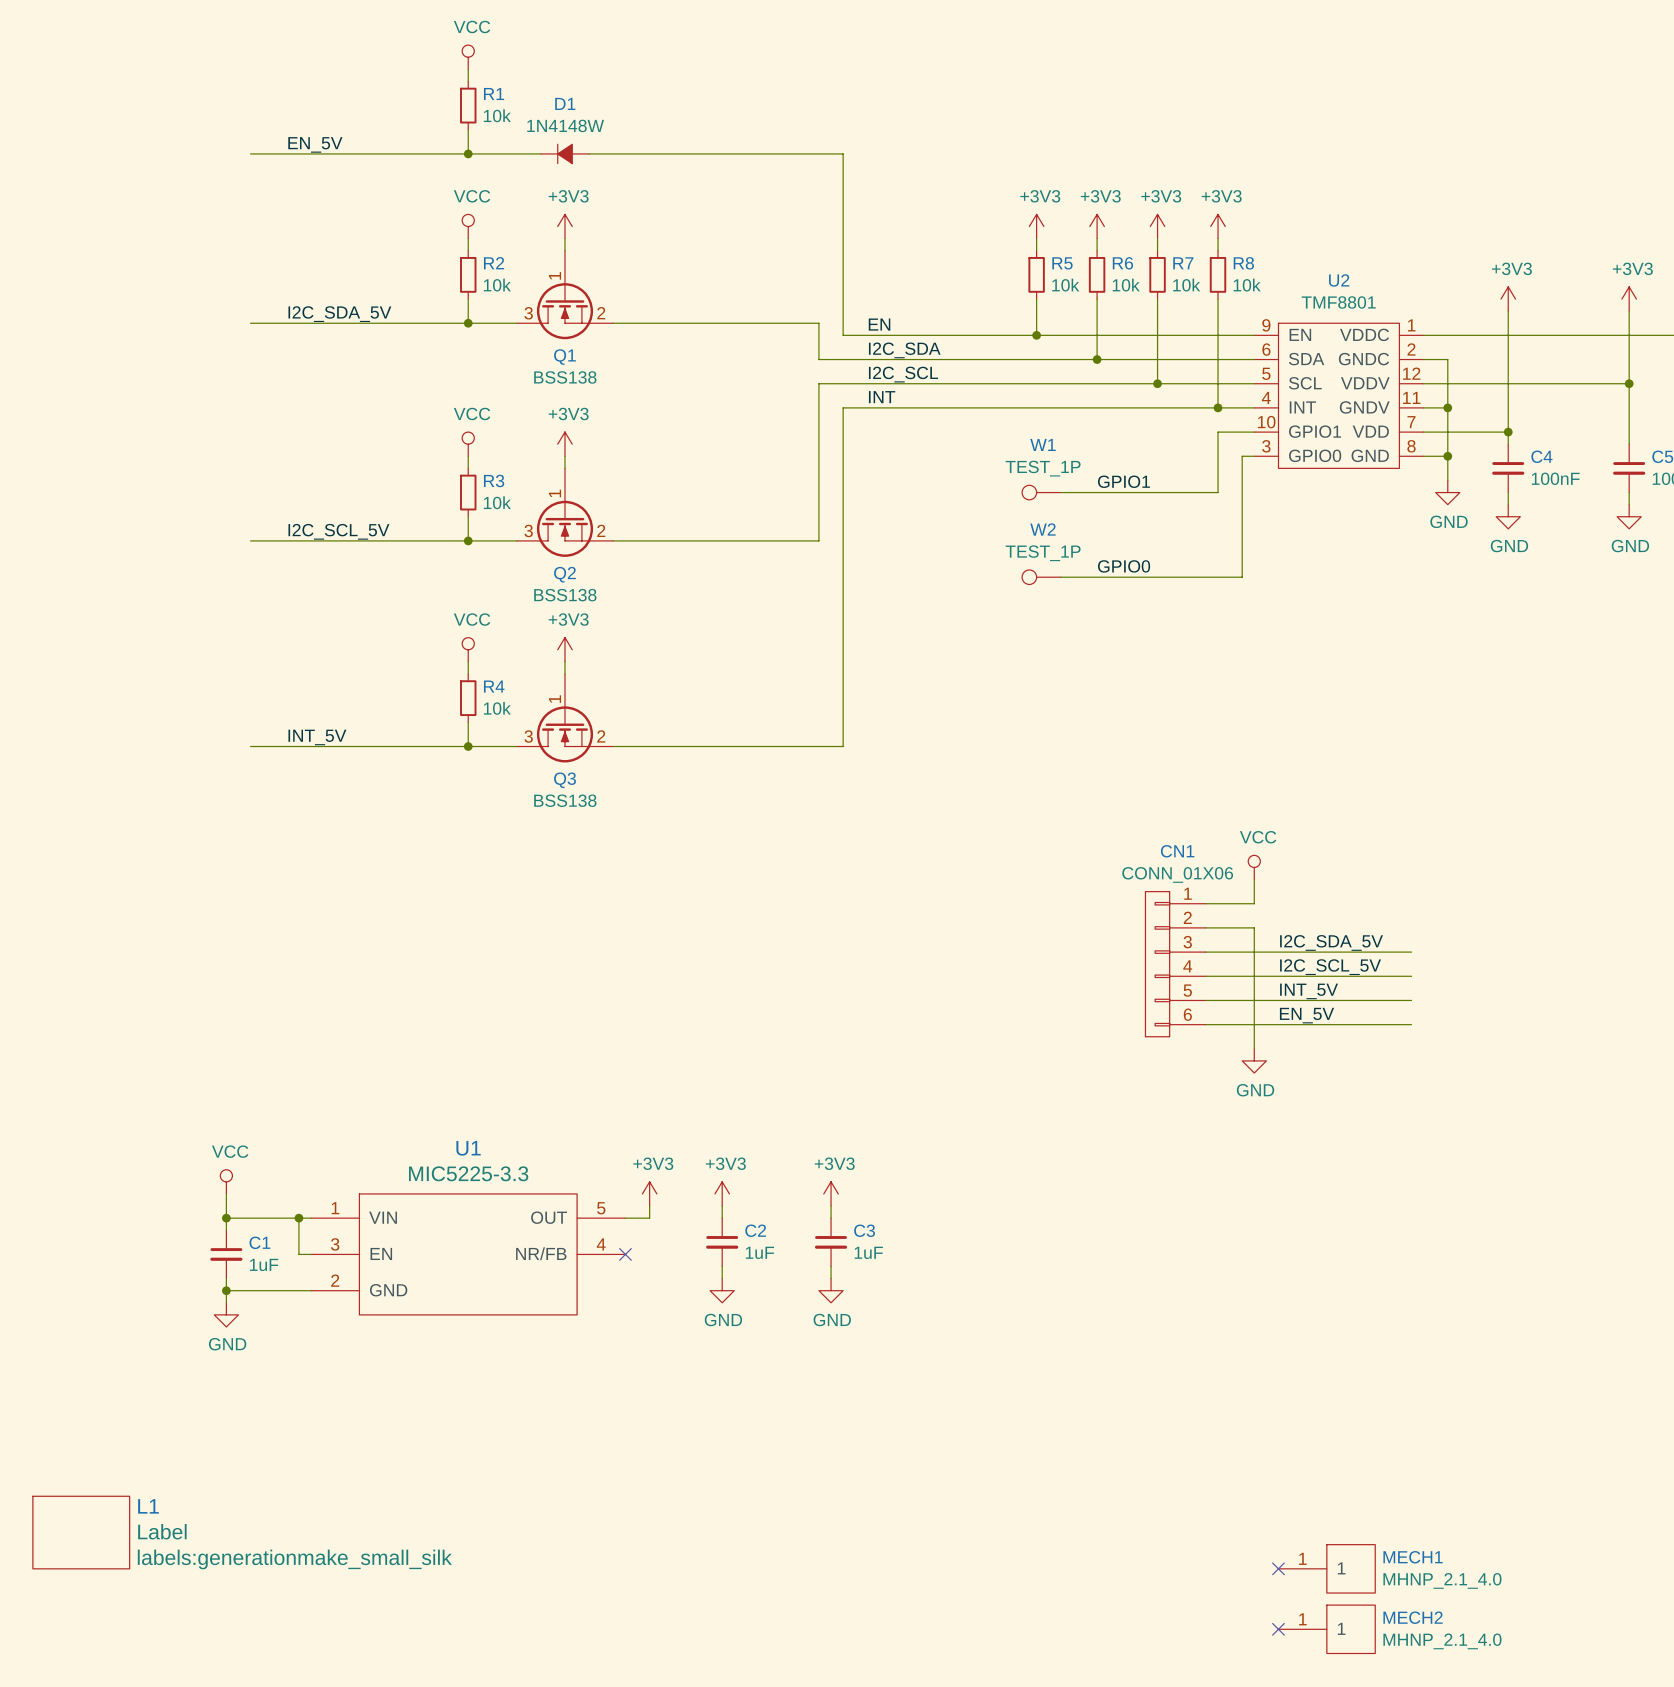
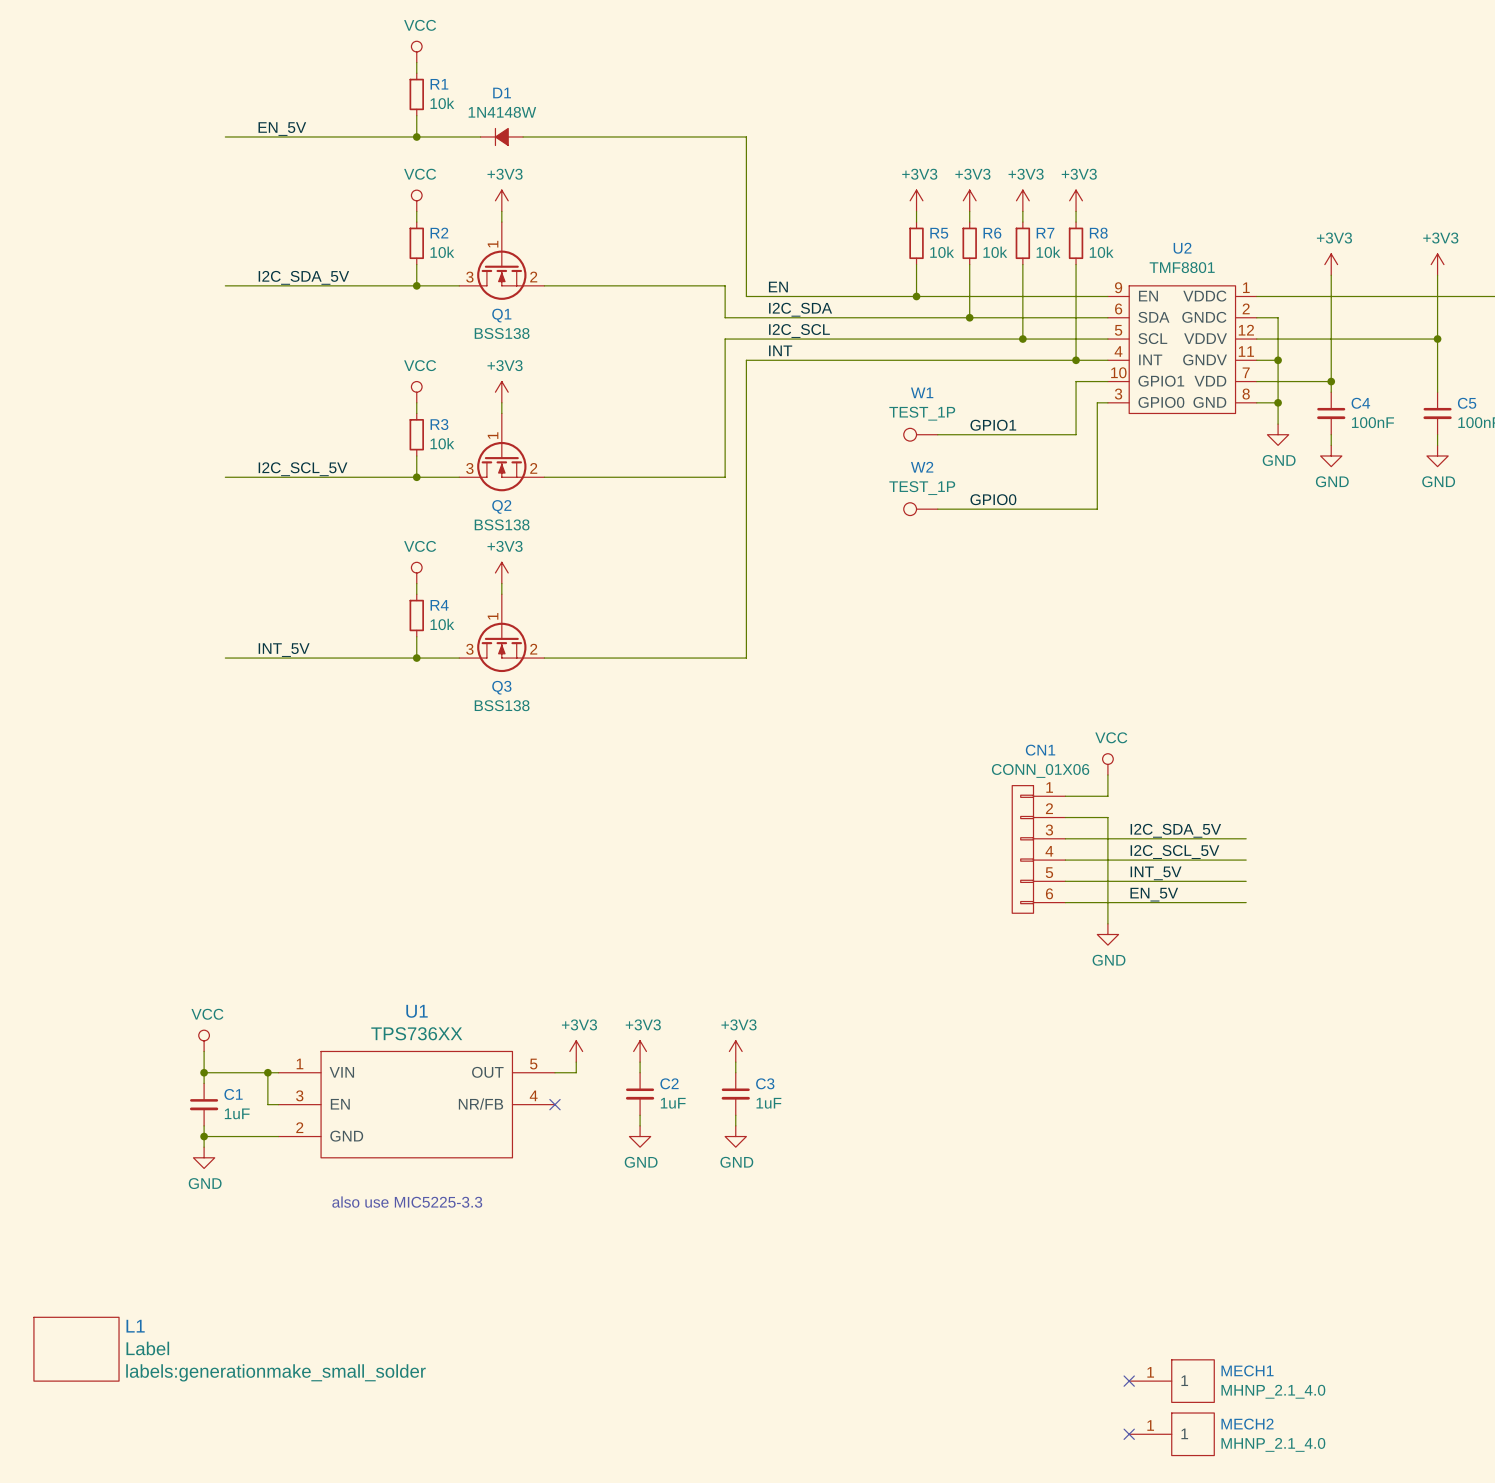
U1 value: MIC5225-3.3 (468, 1173) -> TPS736XX (416, 1033)
text: none -> also use MIC5225-3.3 (407, 1202)
L1 text: labels:generationmake_small_silk (294, 1559) -> labels:generationmake_small_solder (275, 1372)

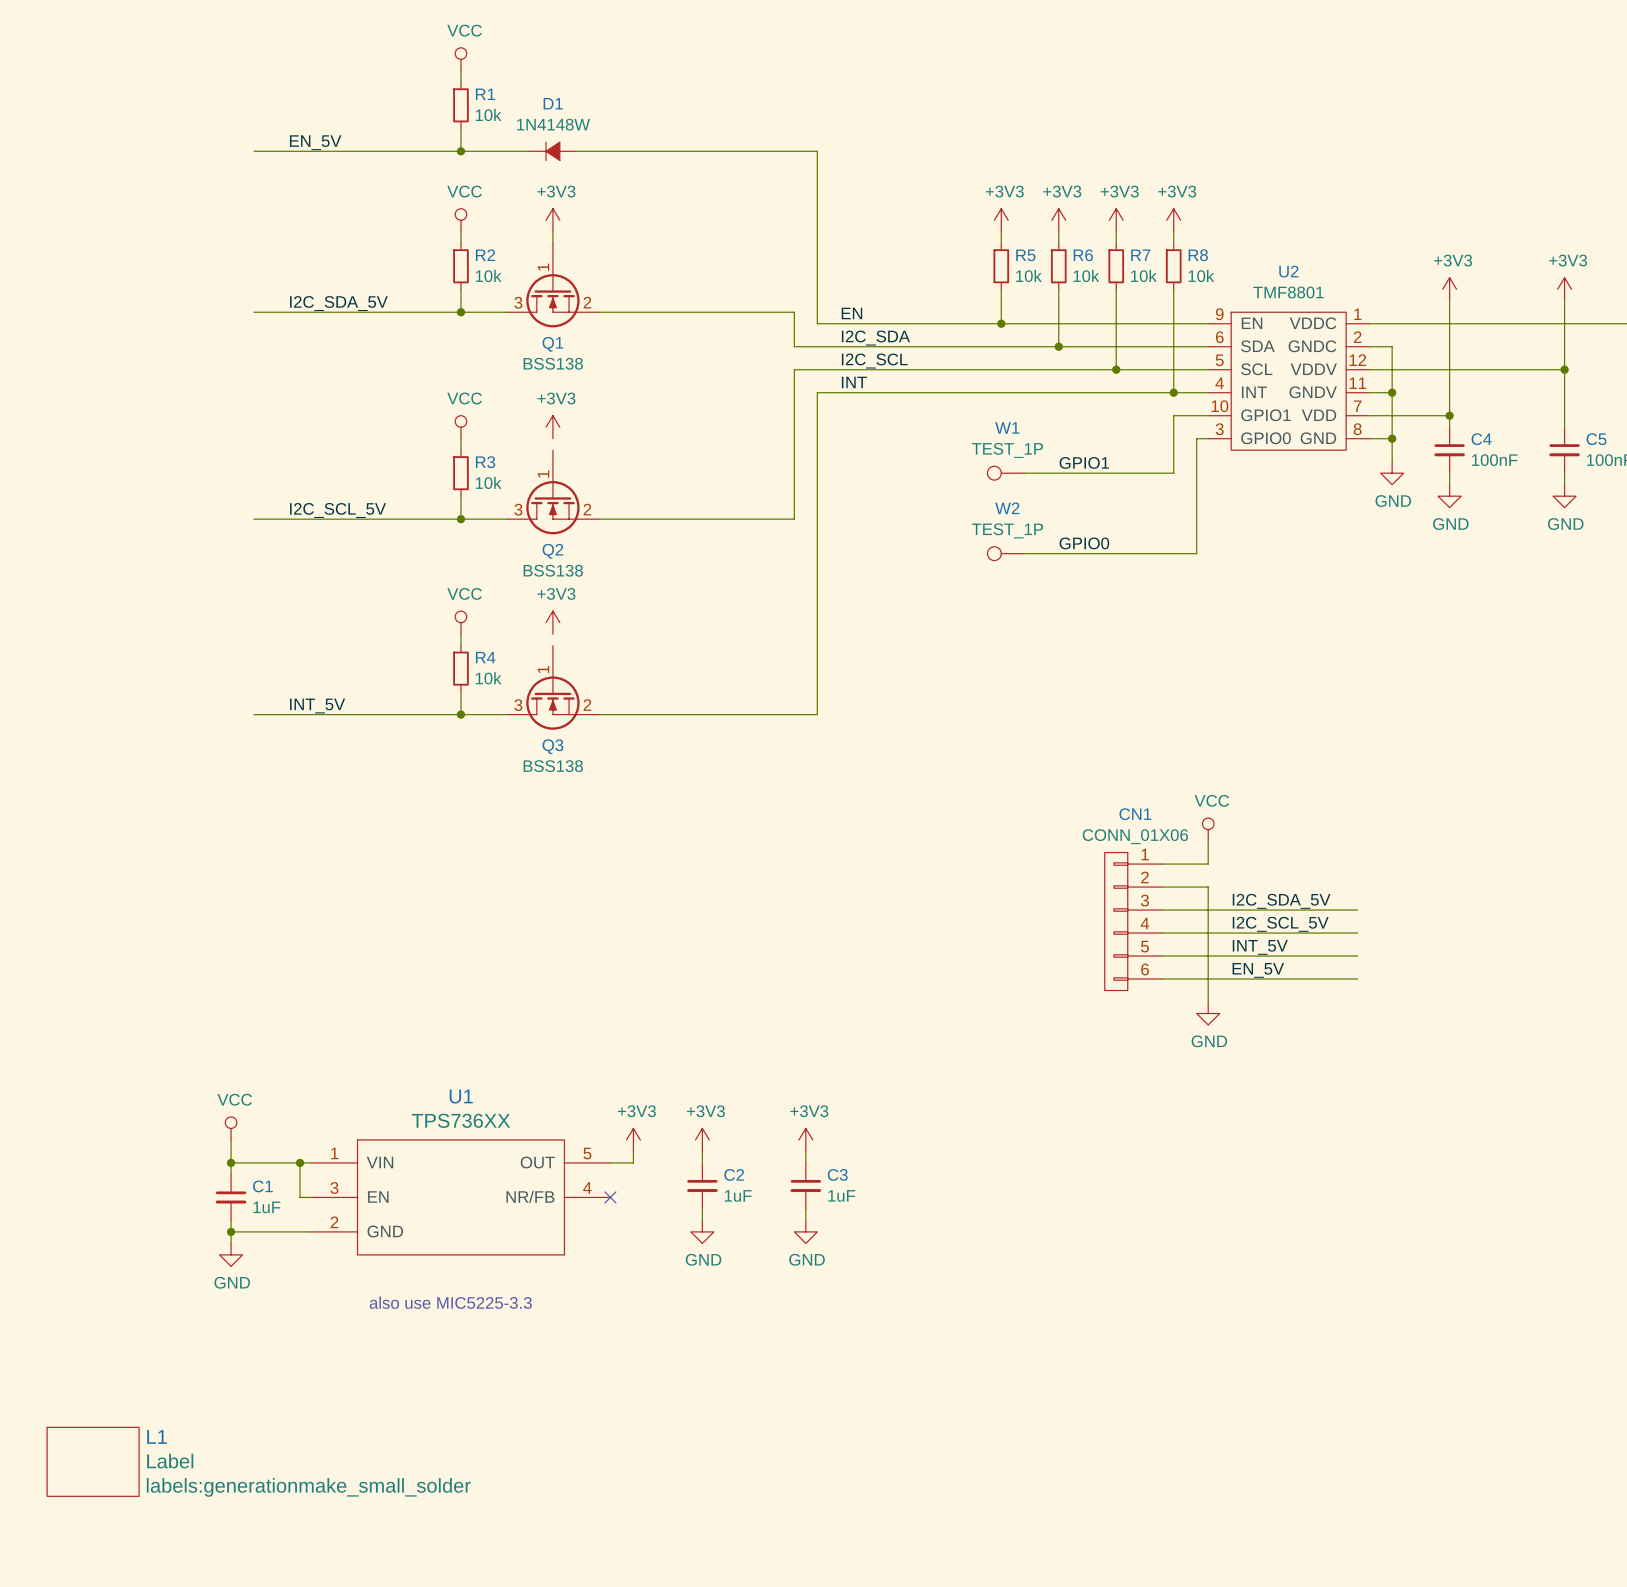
wire: (501, 402) (501, 413) -> none
wire: (501, 583) (501, 594) -> none
no-connect mark: (1129, 1381) -> none
MECH1: MHNP_2.1_4.0 (1171, 1381) -> none
no-connect mark: (1129, 1434) -> none
MECH2: MHNP_2.1_4.0 (1171, 1434) -> none

